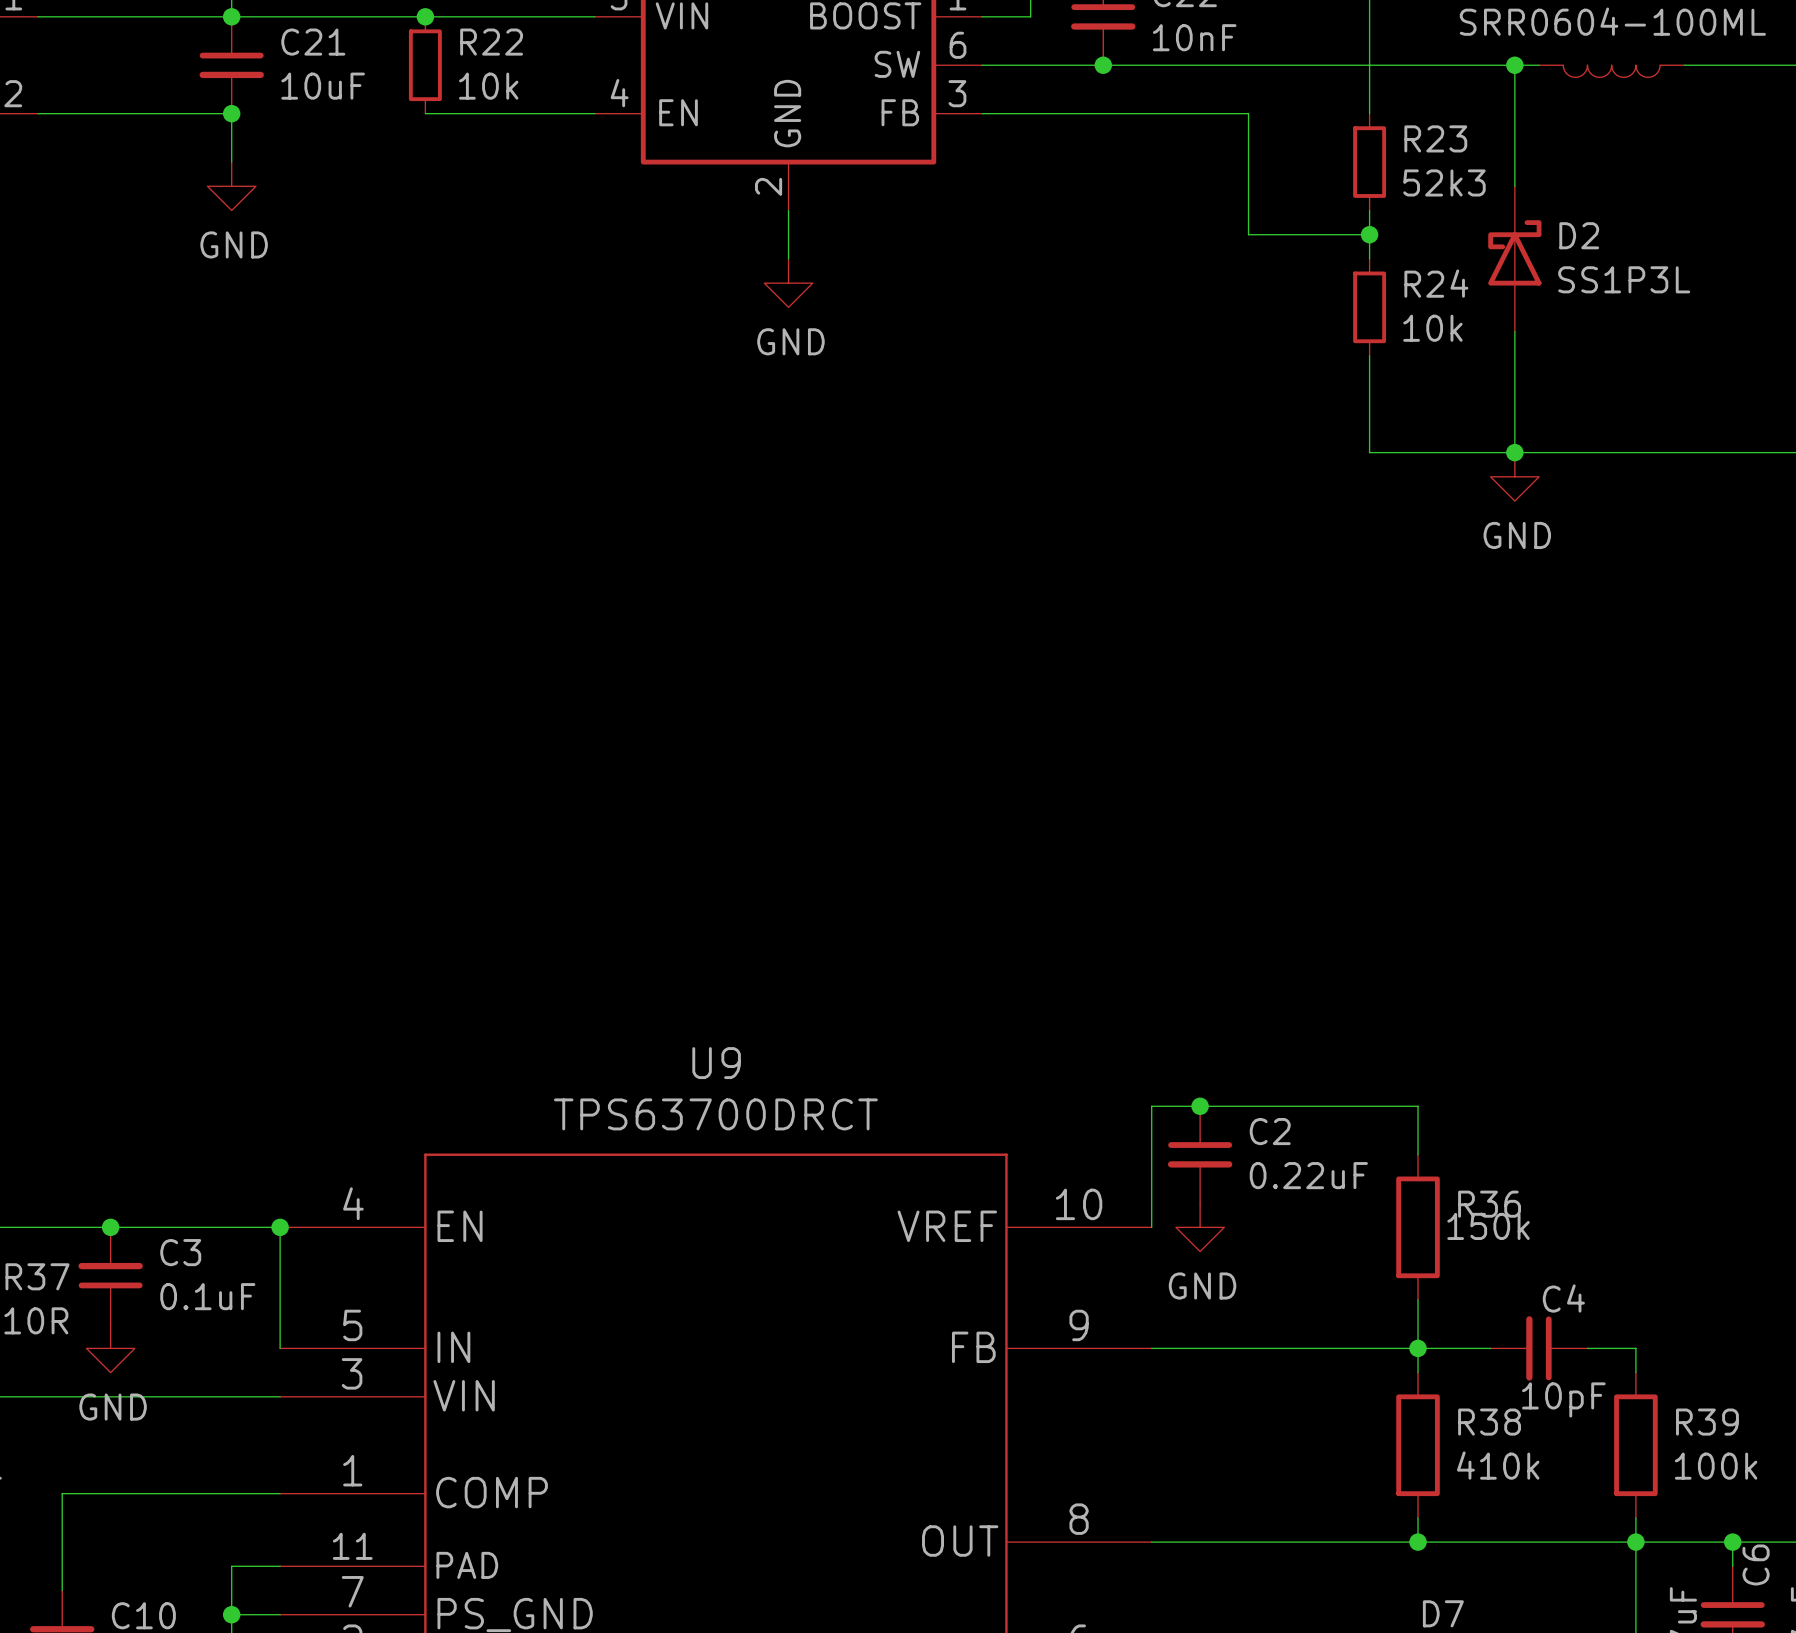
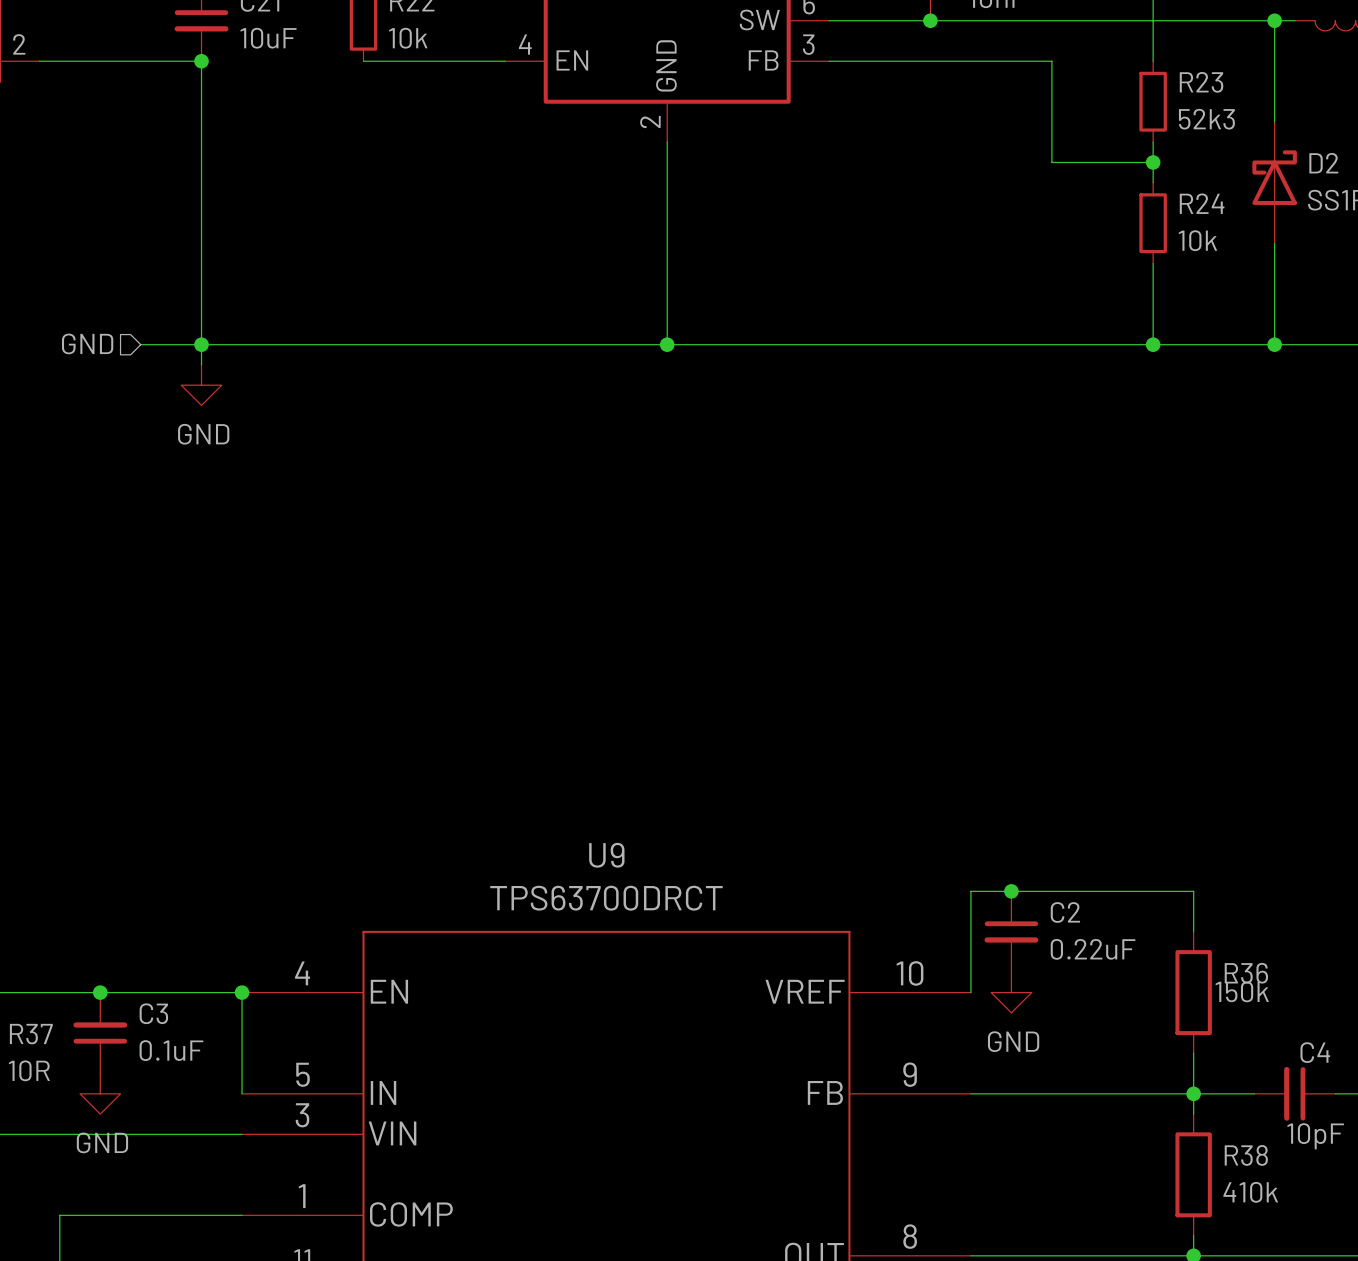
wire: none -> (201, 101) (201, 364)
power symbol: GND (231, 186) -> none
wire: none -> (667, 182) (667, 344)
power symbol: GND (788, 283) -> none
hierarchical label: none -> GND (87, 343)
wire: none -> (140, 344) (1153, 344)
junction: none -> (201, 344)
junction: none -> (667, 344)
junction: none -> (1153, 344)
power symbol: GND (1514, 476) -> none
power symbol: none -> GND (201, 385)

